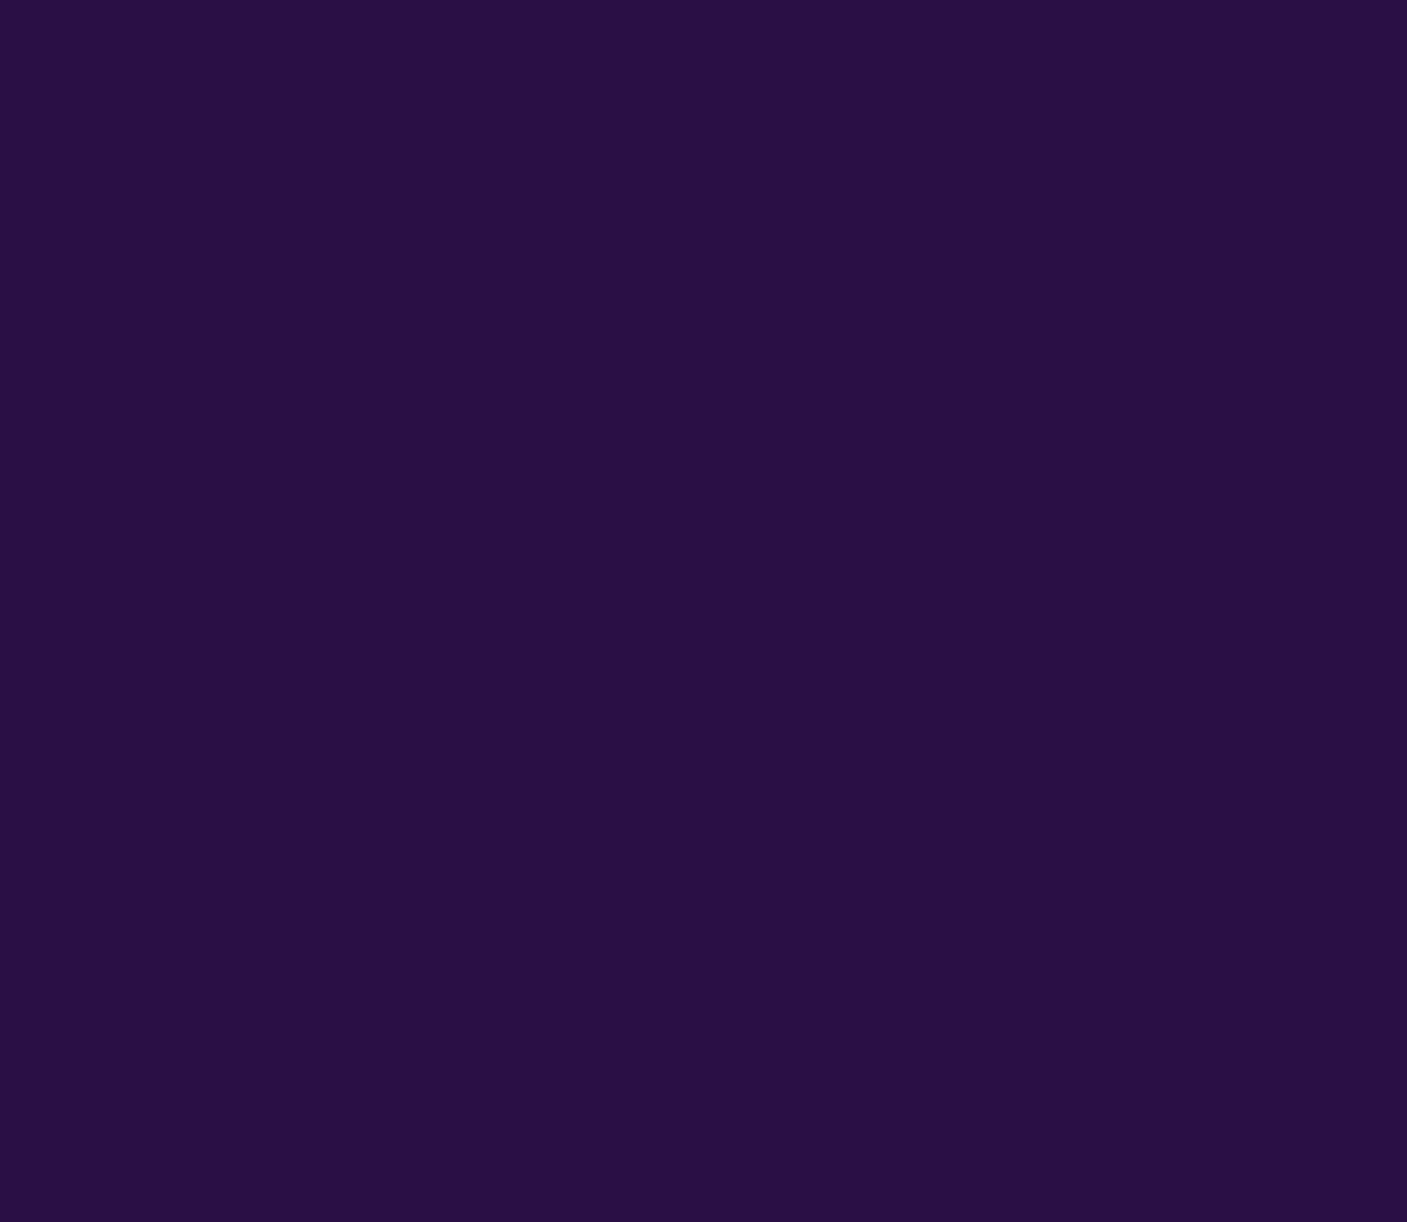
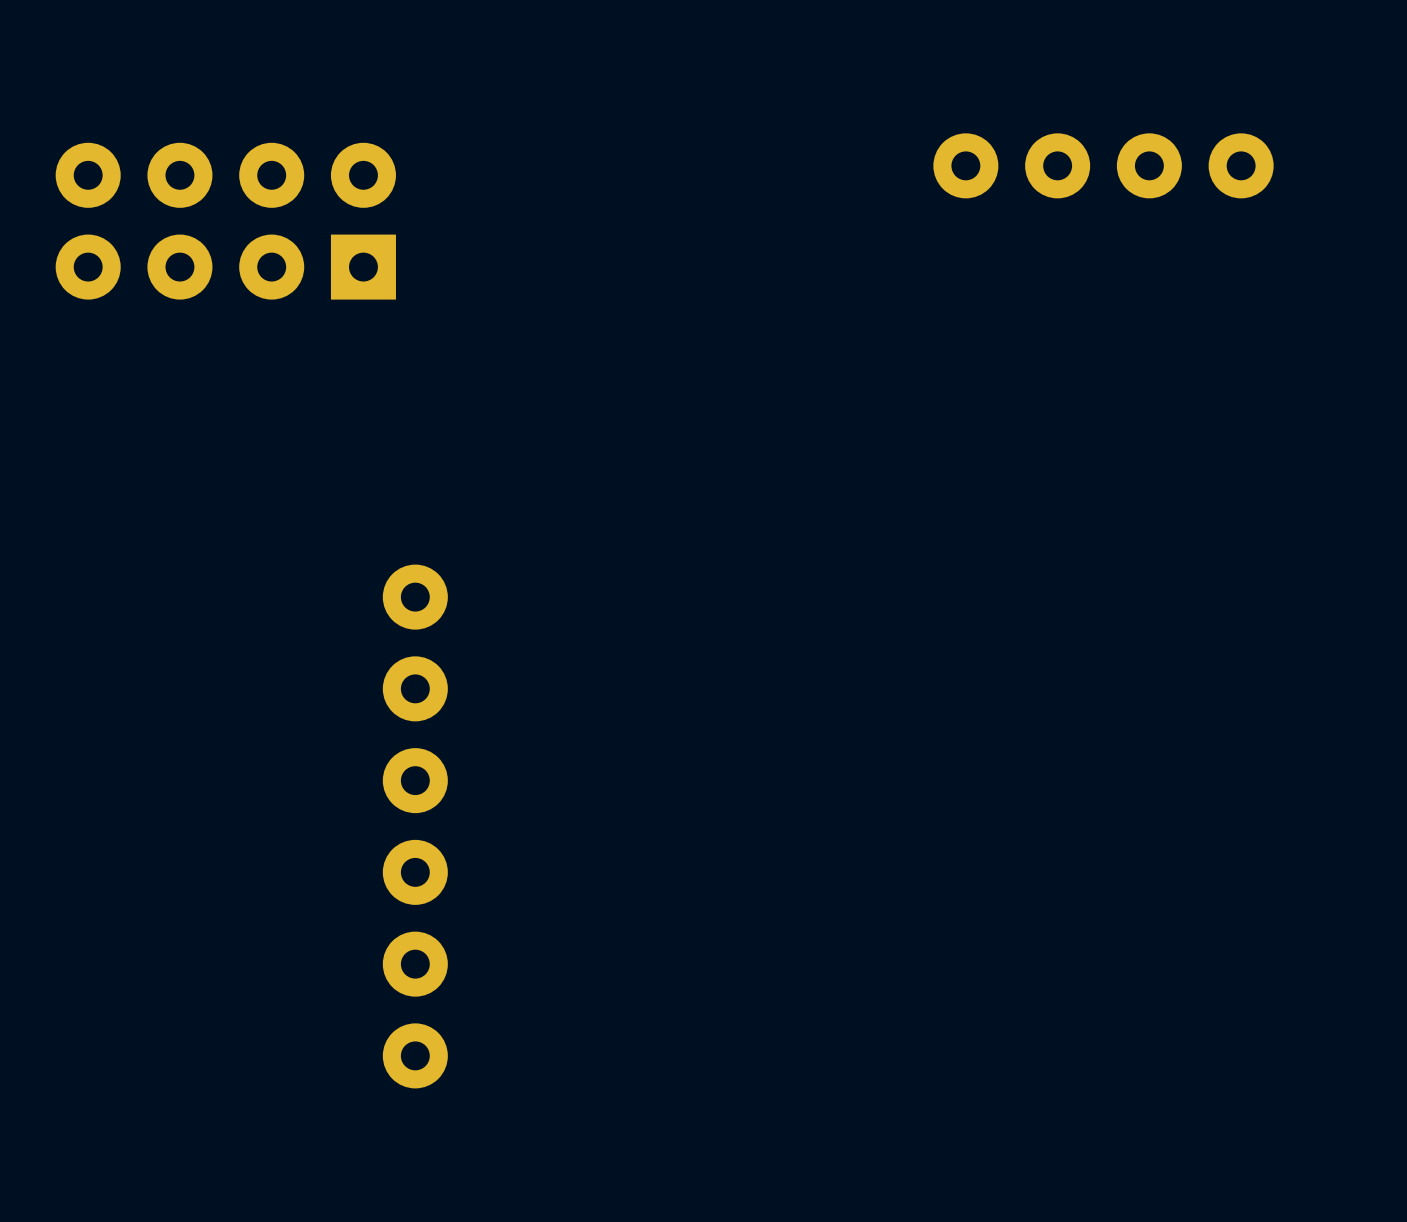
part: none -> (1103, 165)
part: none -> (225, 221)
part: none -> (415, 826)

